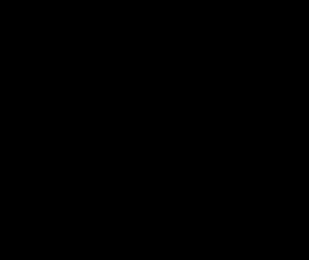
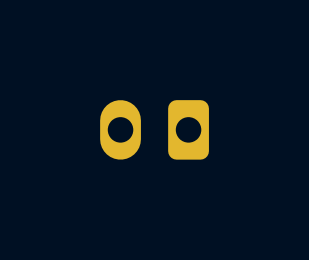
part: none -> (154, 129)

